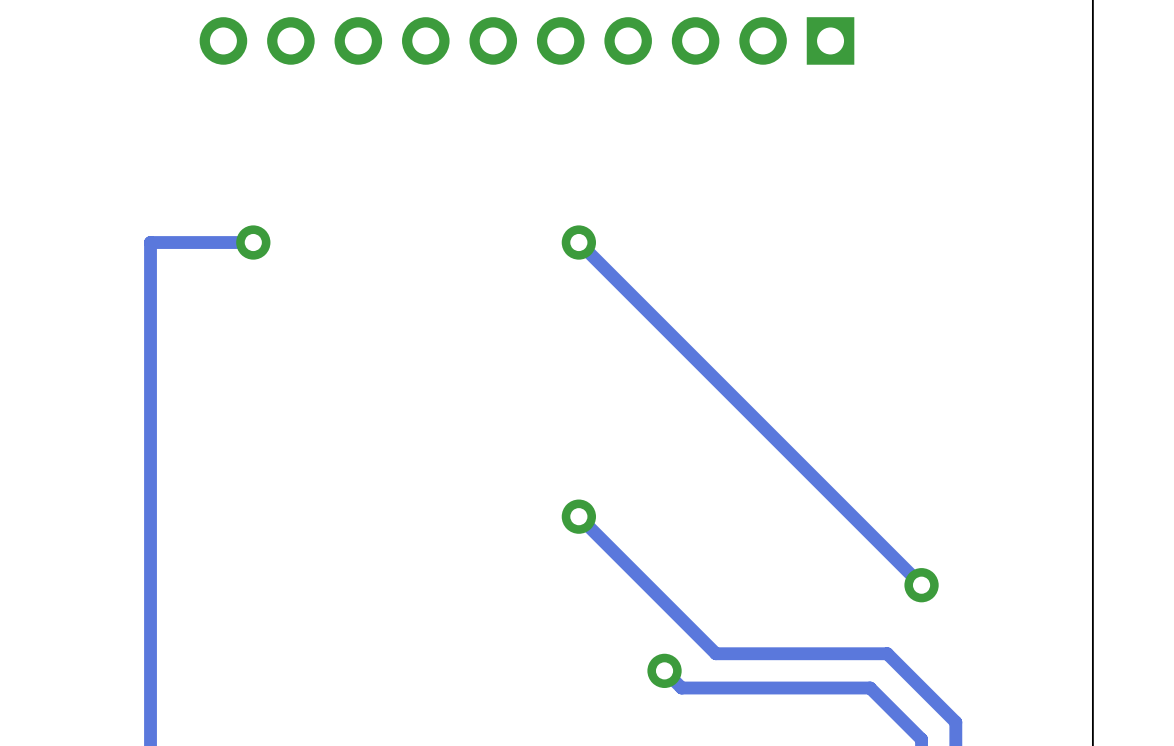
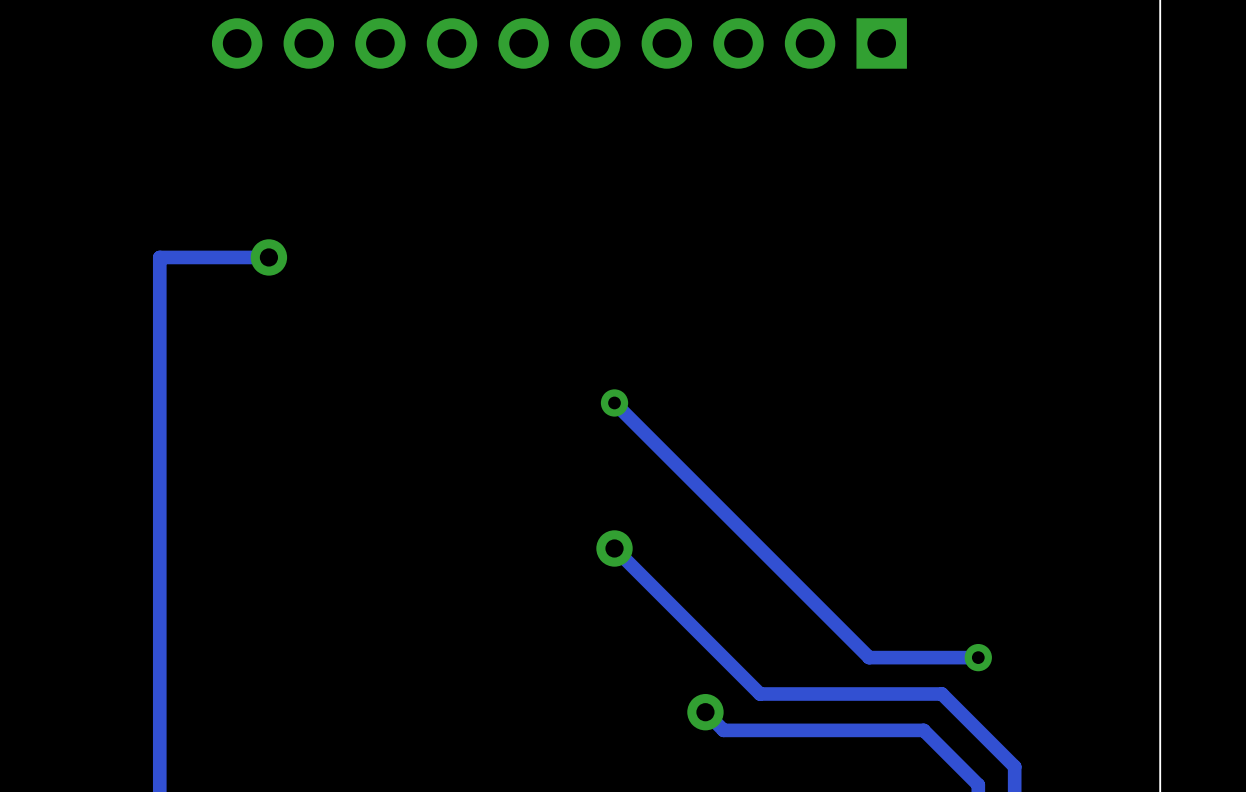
track: (578, 242) (921, 585) -> none
via: (578, 242) -> none
track: none -> (614, 402) (869, 657) (978, 657)
via: none -> (614, 402)
via: (921, 585) -> none
via: none -> (978, 657)

